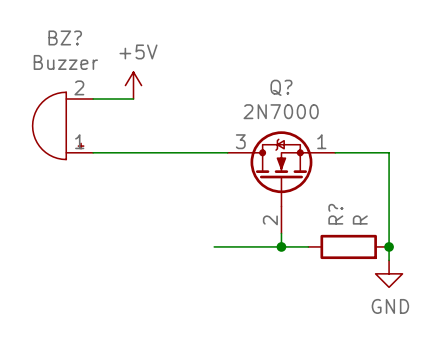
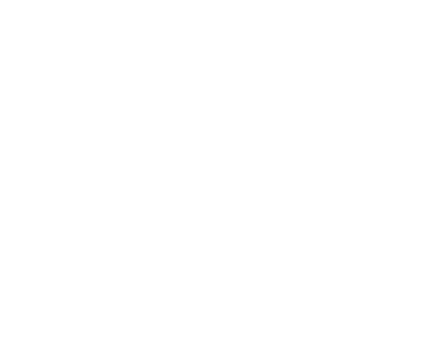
power symbol: +5V (133, 85) -> none
wire: (93, 99) (133, 99) -> none
BZ?: Buzzer (62, 125) -> none
wire: (93, 152) (227, 152) -> none
wire: (335, 152) (389, 152) (389, 260) -> none
Q?: 2N7000 (281, 182) -> none
wire: (281, 233) (281, 246) -> none
wire: (214, 246) (308, 246) -> none
junction: (281, 246) -> none
R?: R (348, 246) -> none
junction: (389, 246) -> none
power symbol: GND (389, 273) -> none

